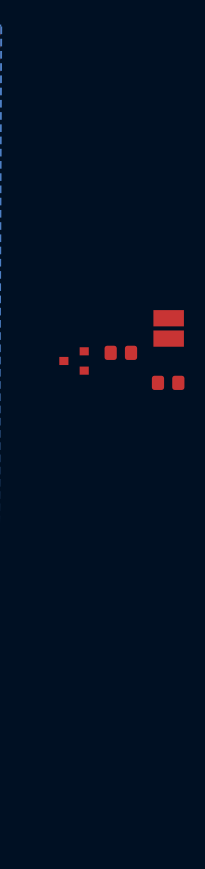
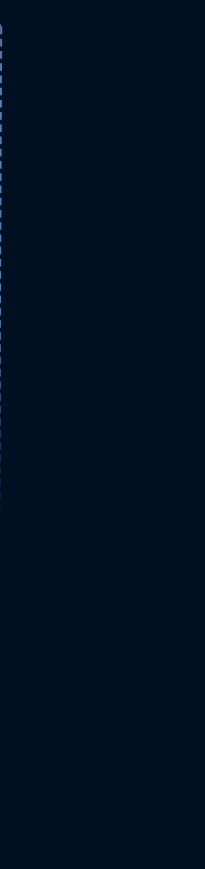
part: (168, 328) -> none
part: (120, 352) -> none
part: (74, 360) -> none
part: (168, 382) -> none

